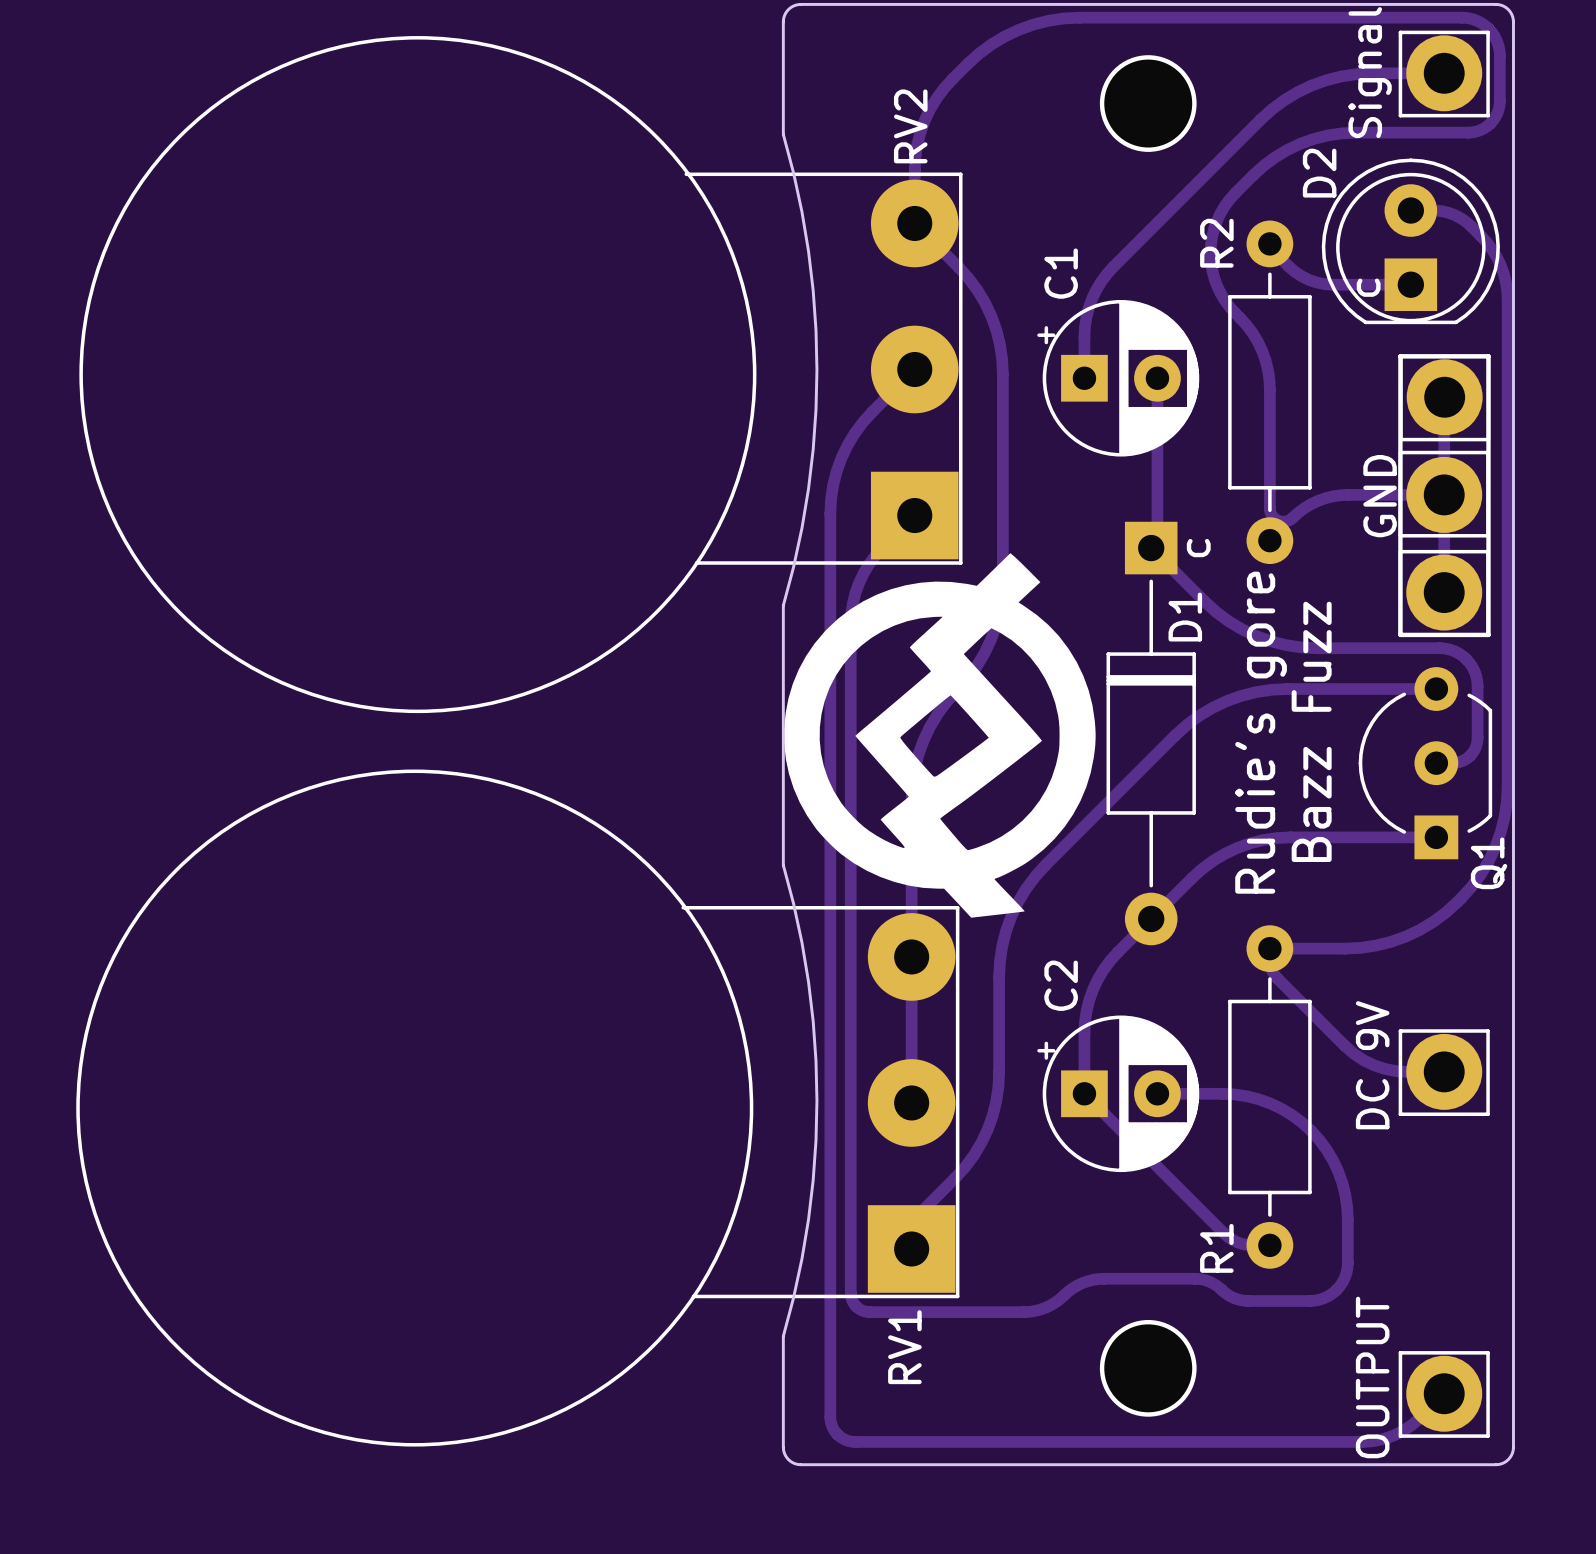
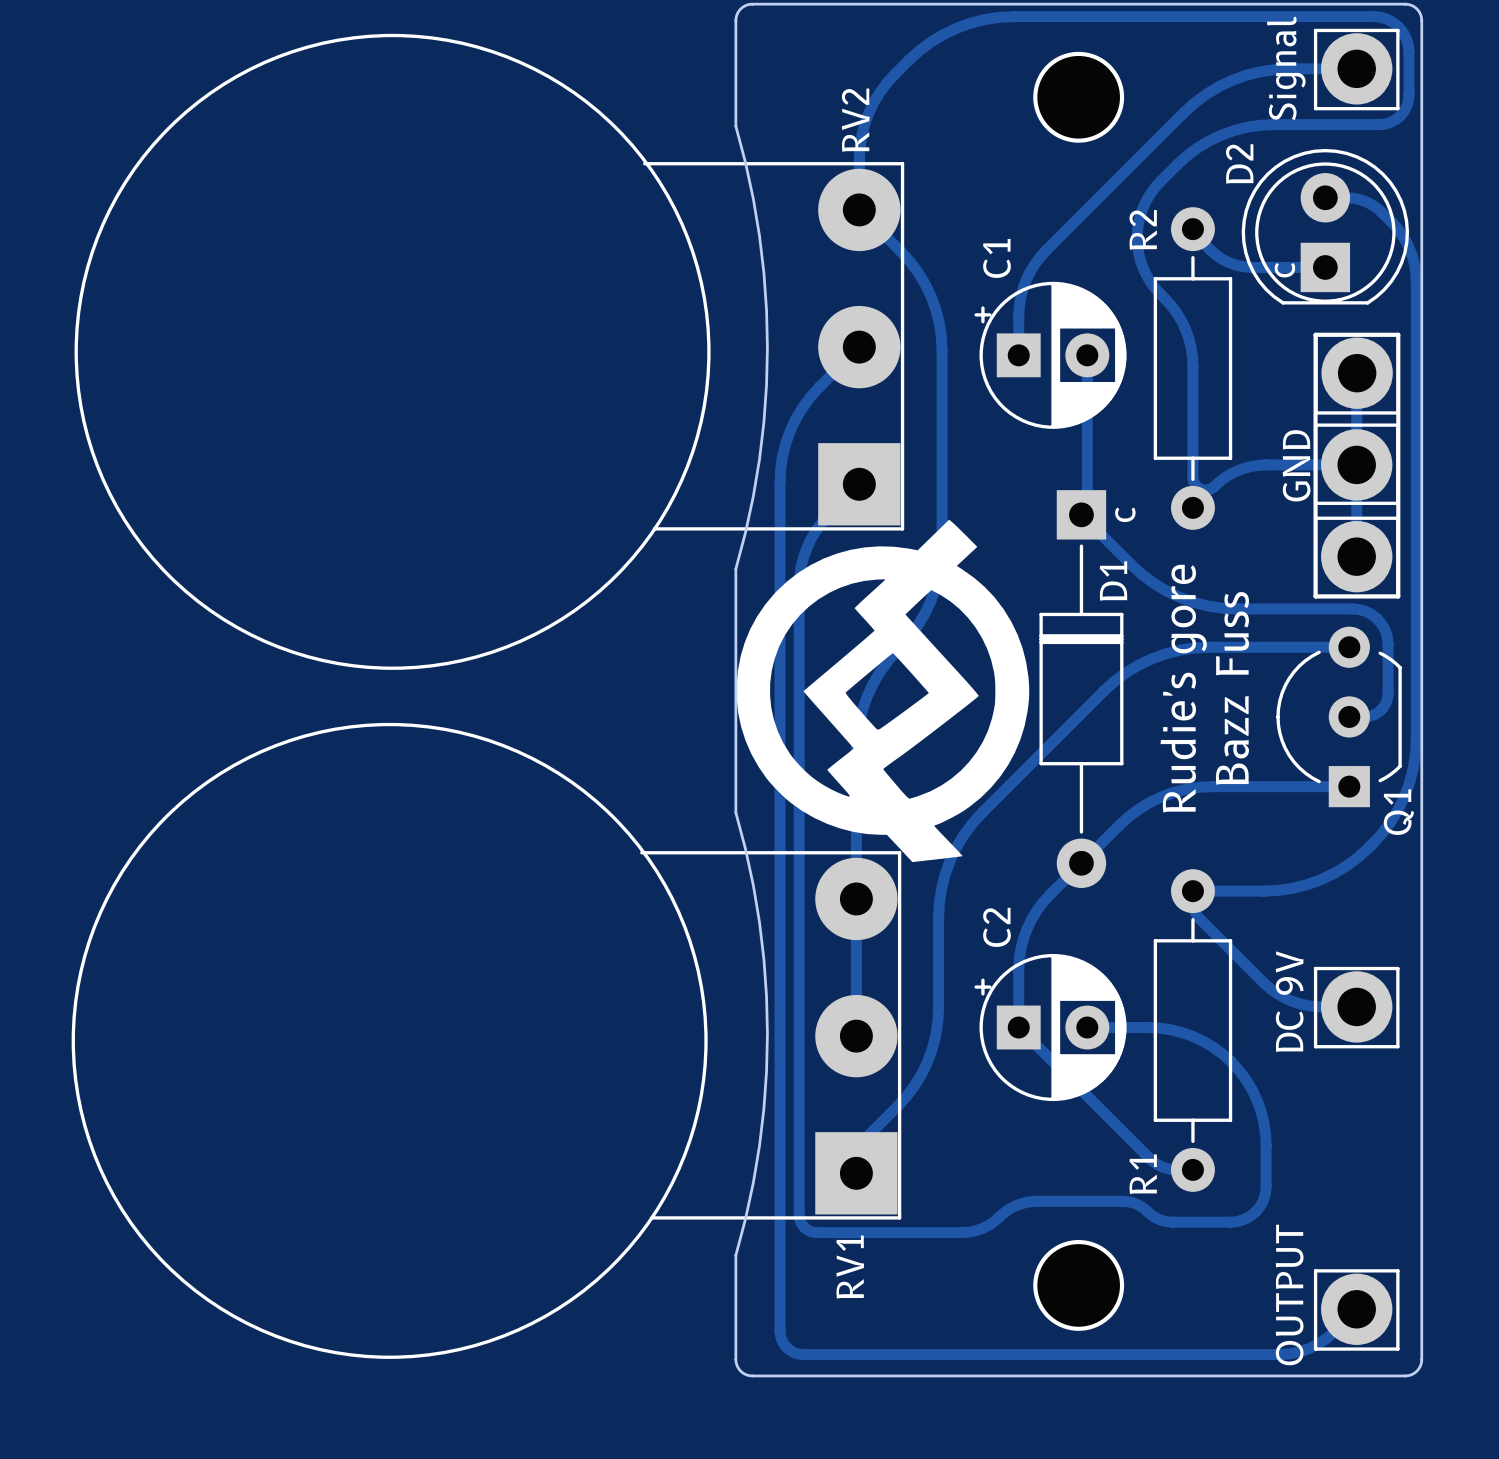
text: Bazz Fuzz (1311, 731) -> Bazz Fuss (1232, 688)

